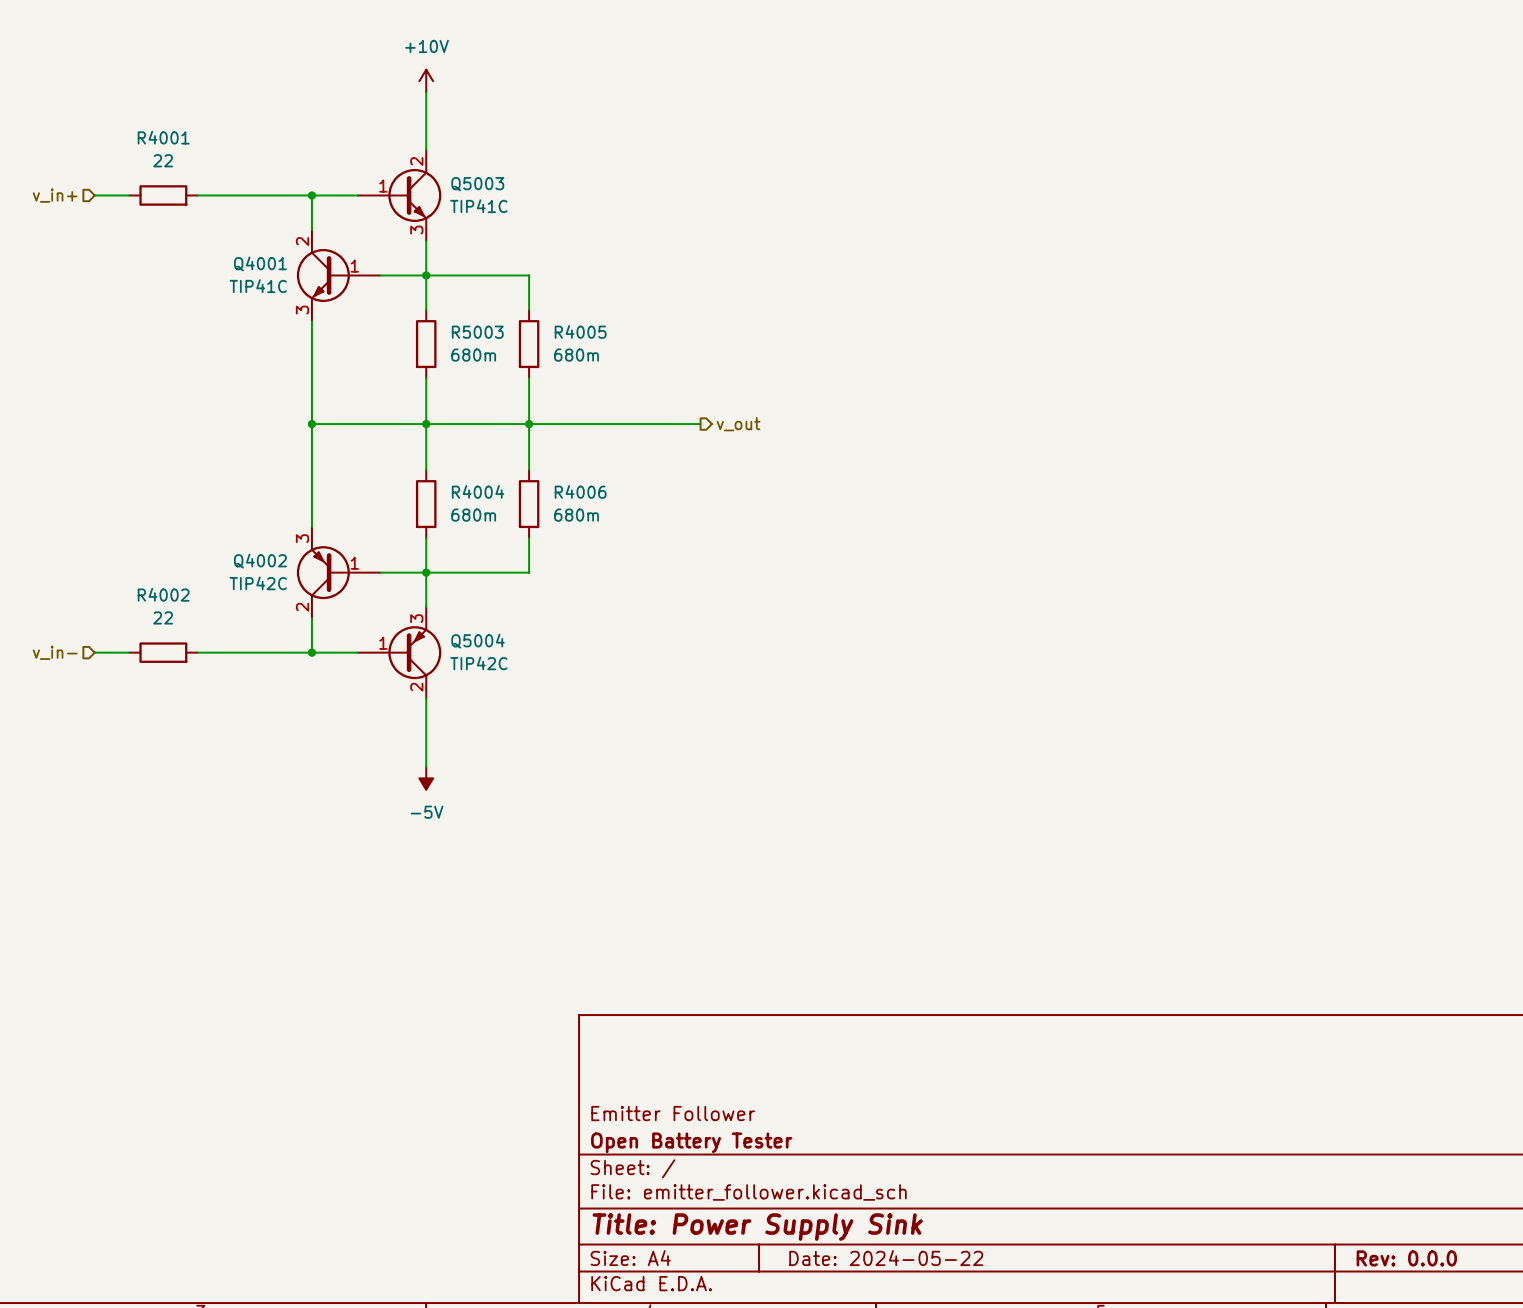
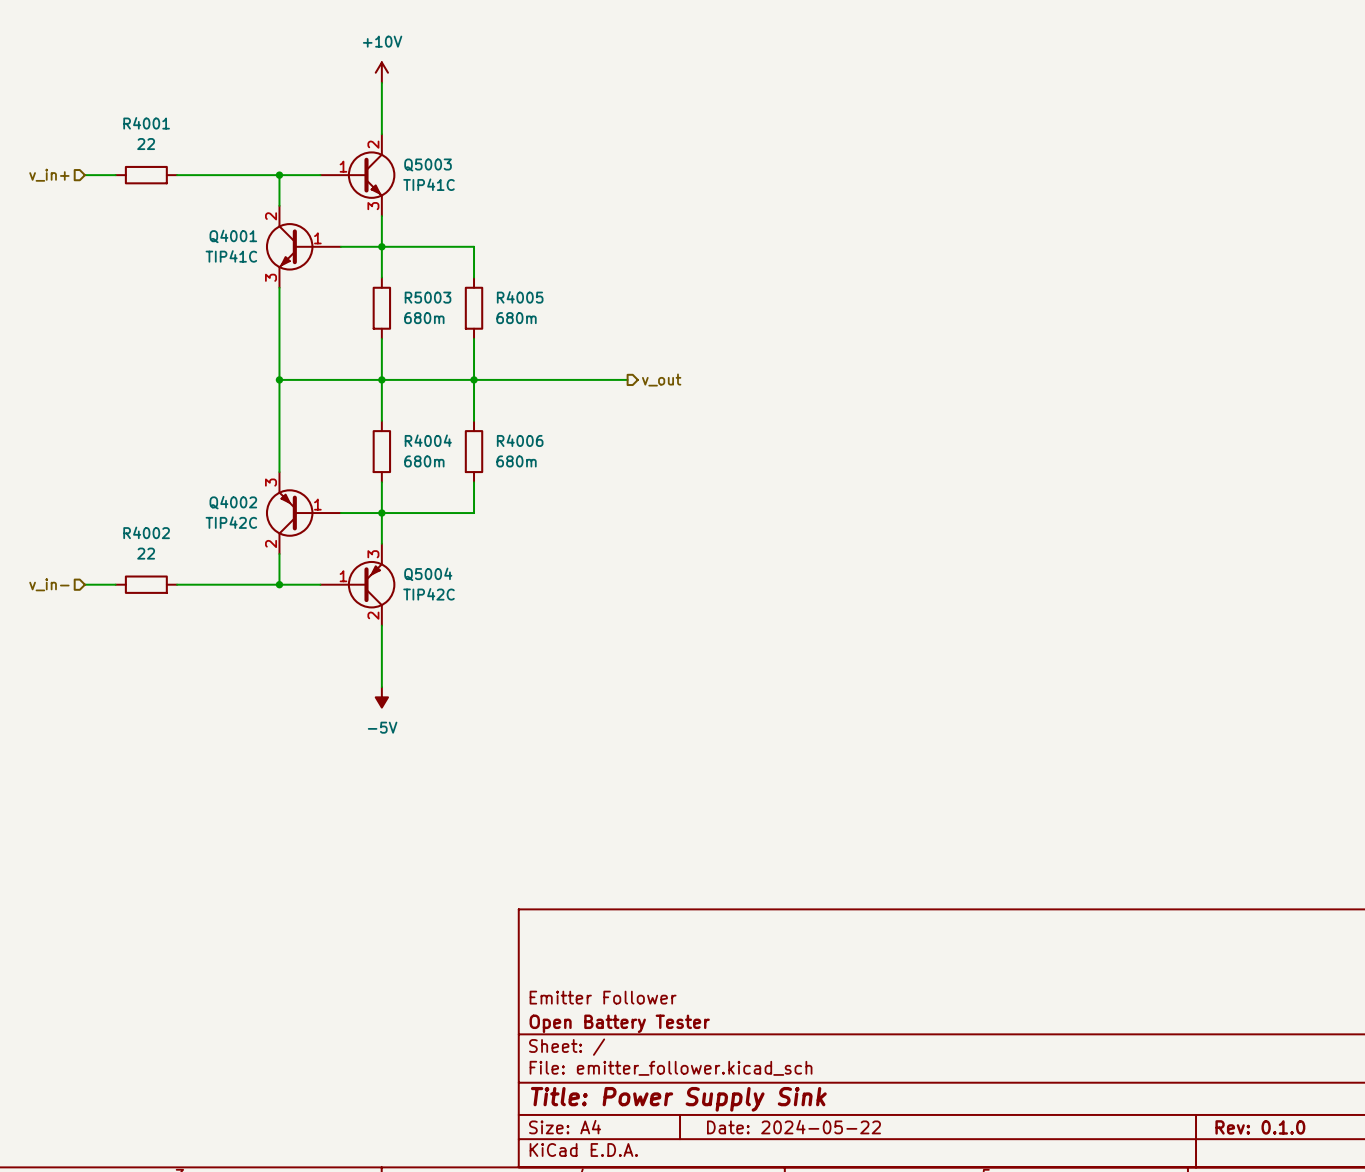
title block: Rev: 0.0.0 (1406, 1258) -> Rev: 0.1.0 (1260, 1127)

